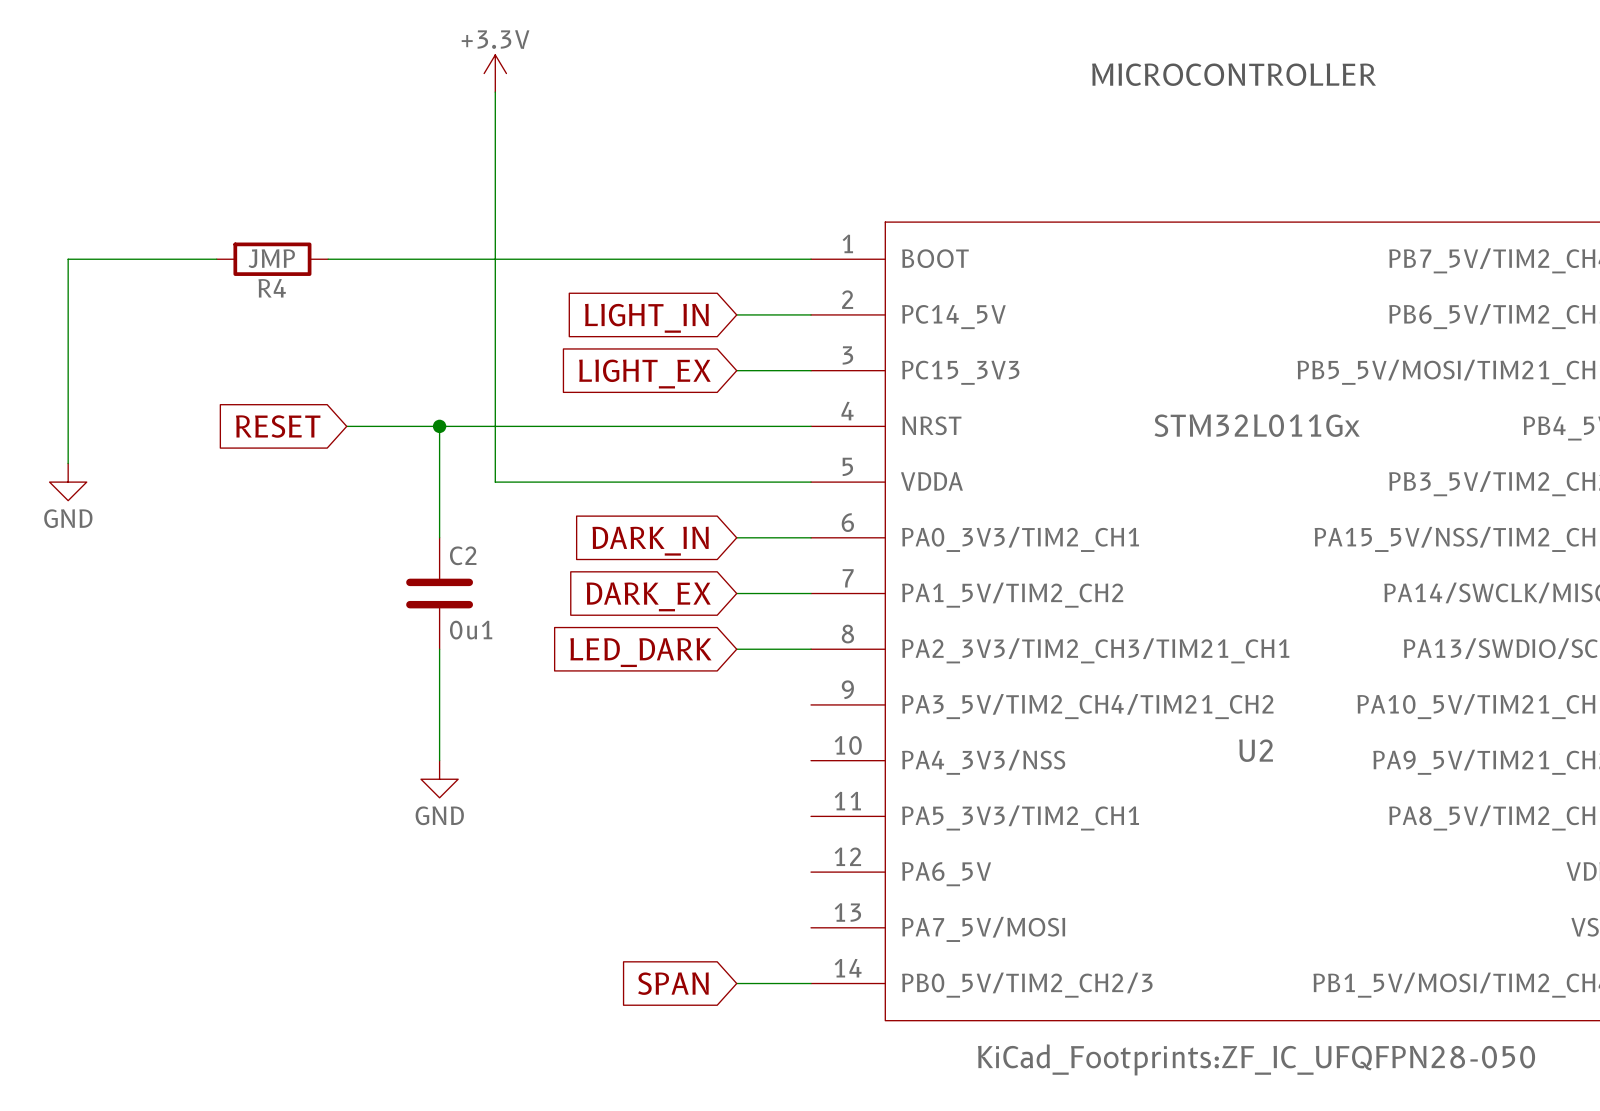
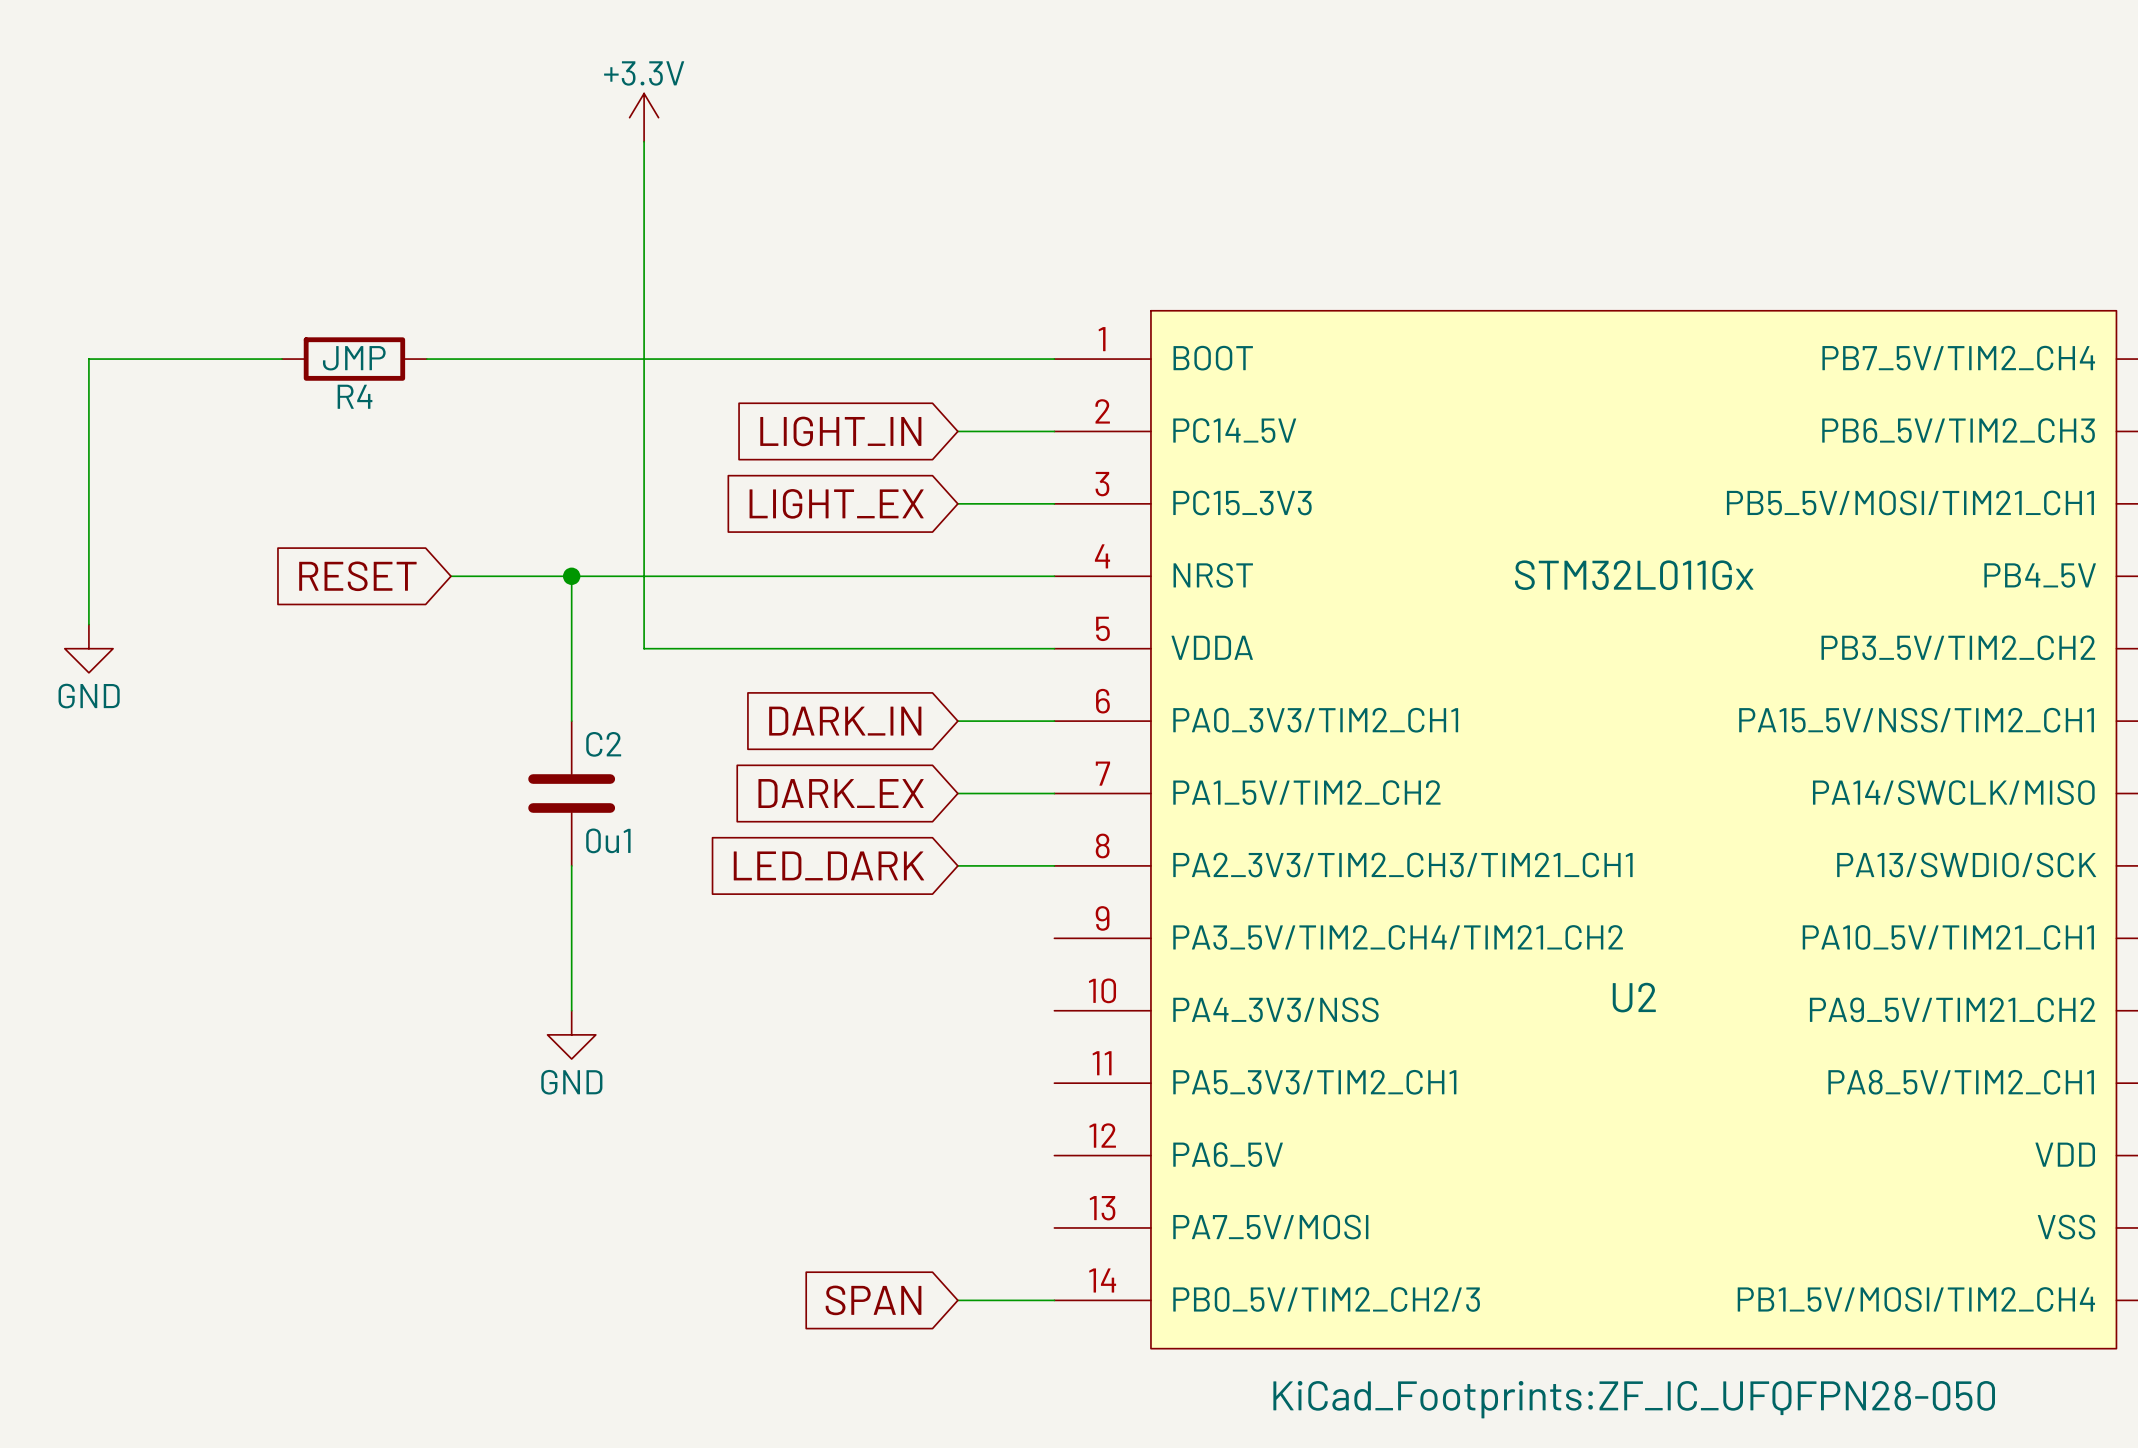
text: MICROCONTROLLER (1234, 74) -> none

